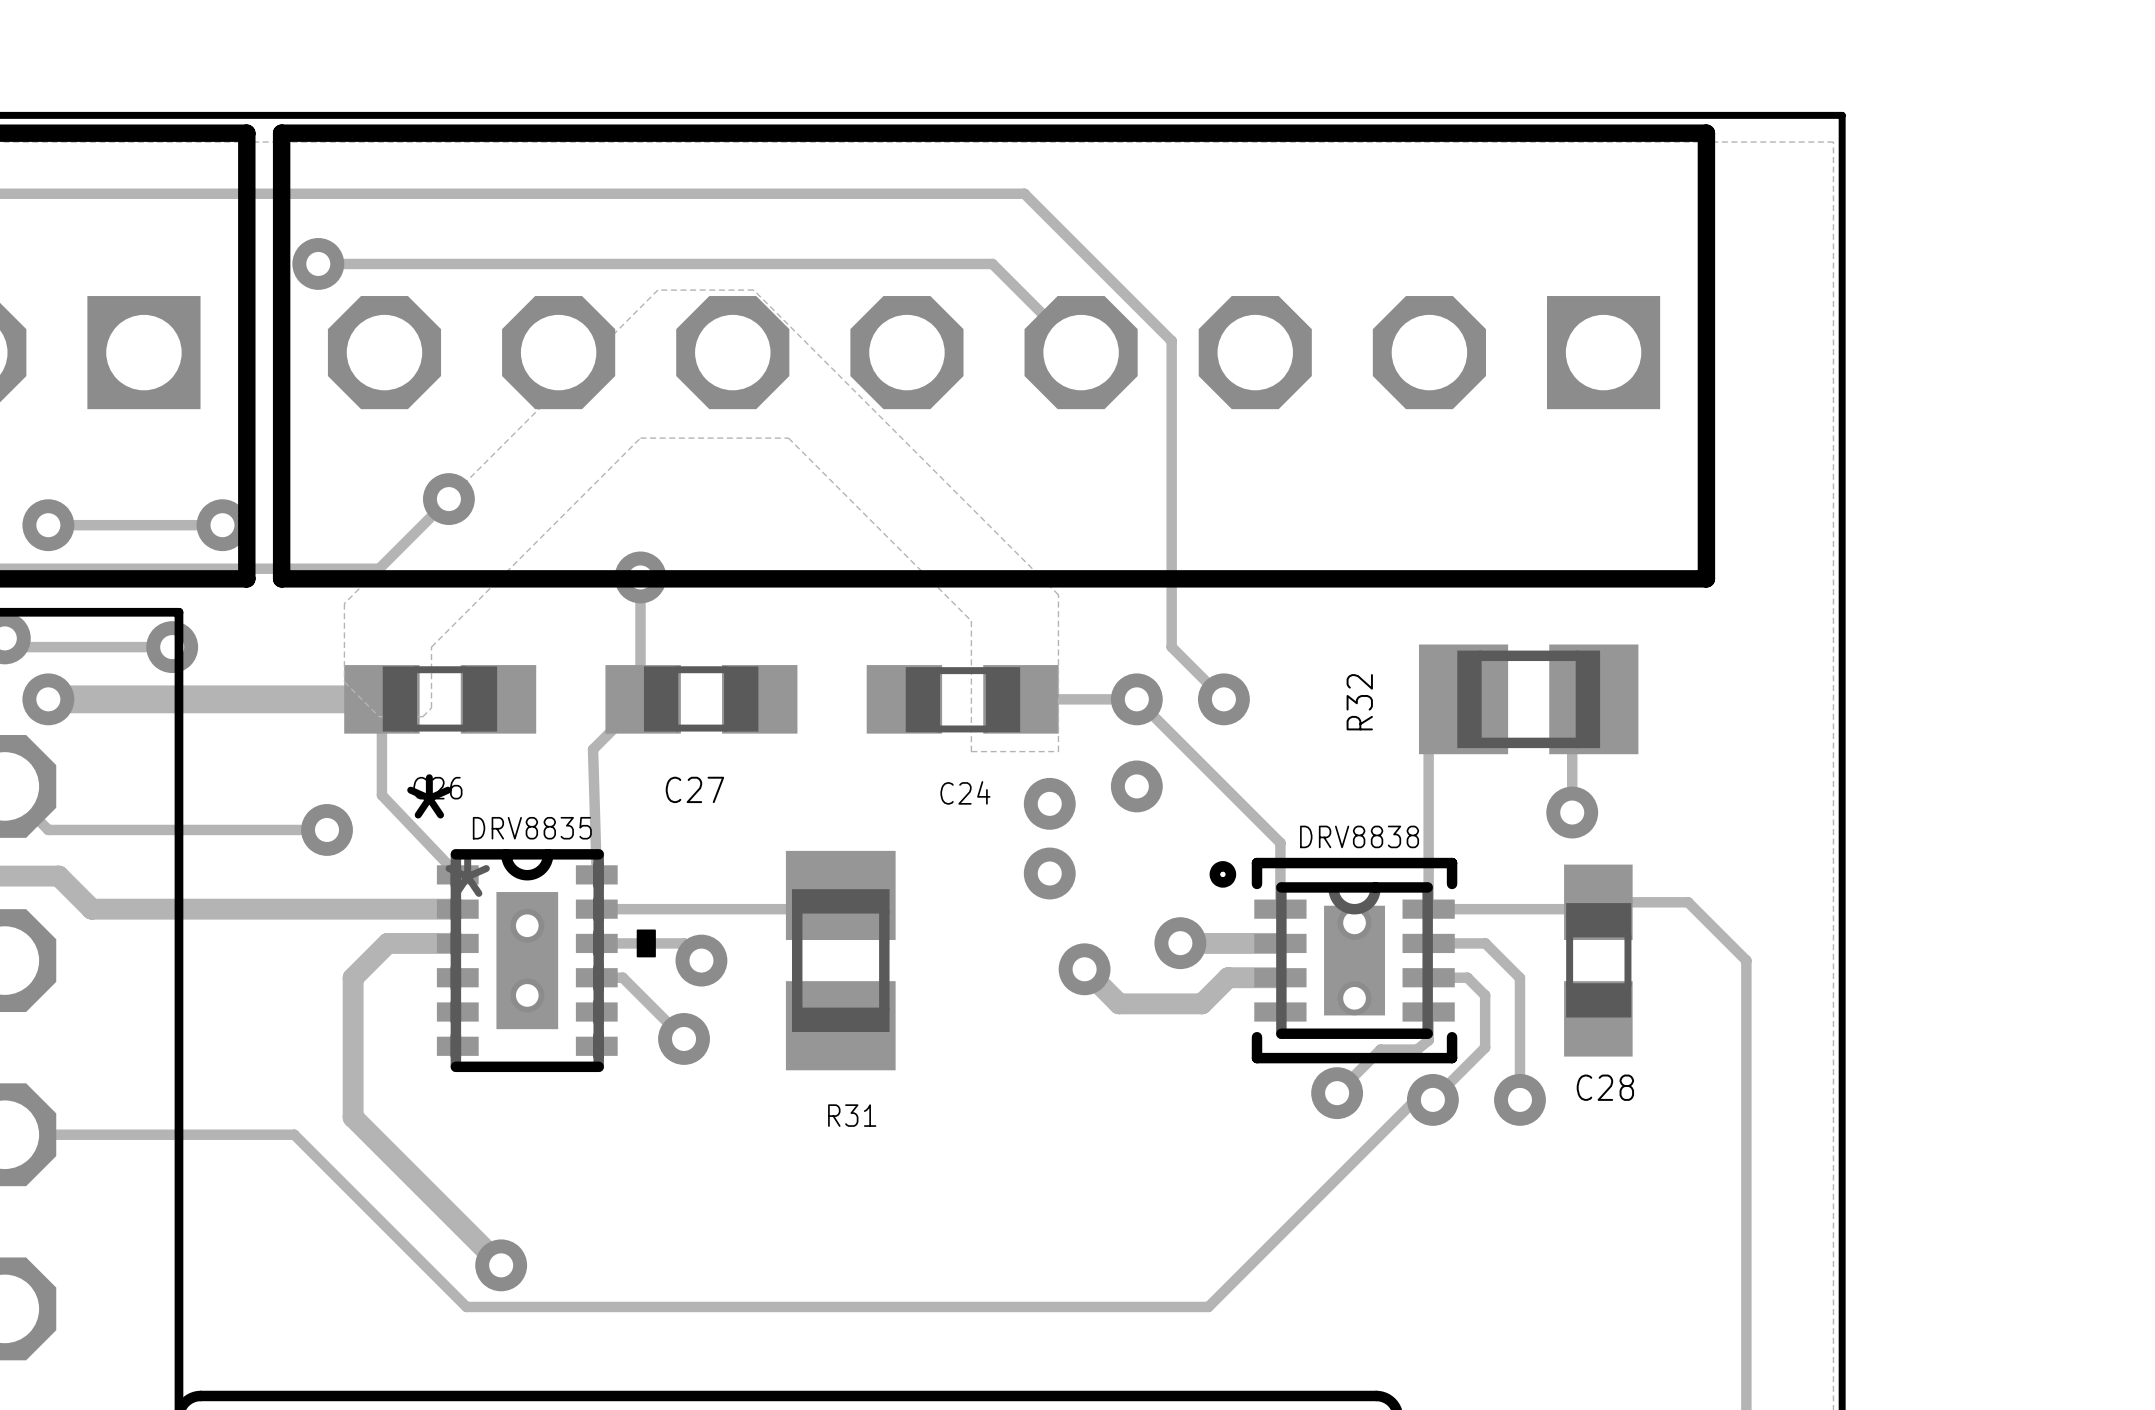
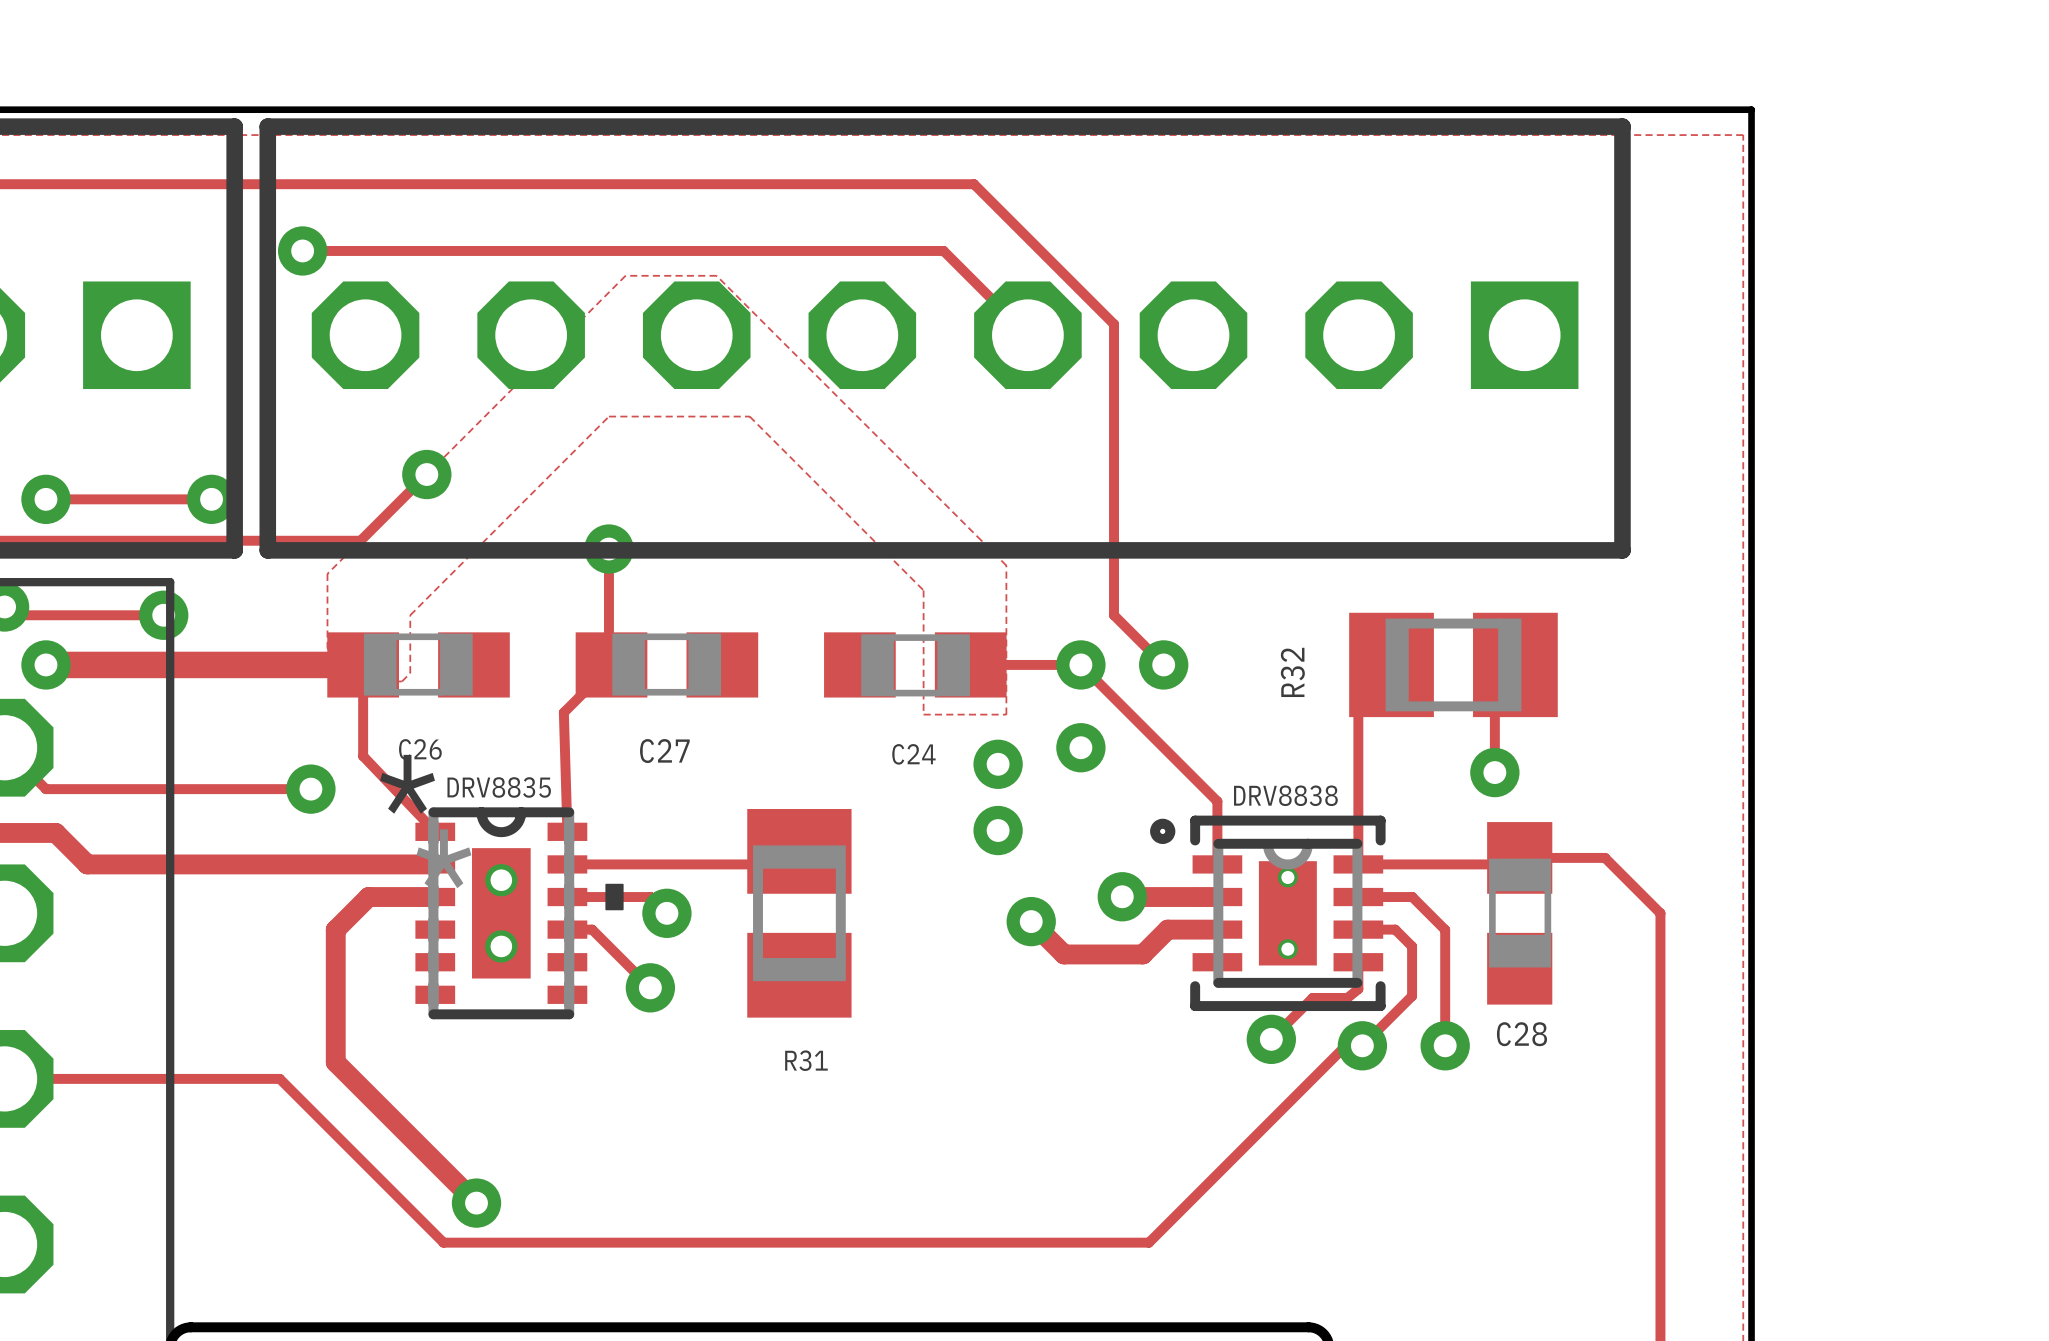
DRV8838 footprint: [1209, 857, 1458, 1064] -> [1150, 815, 1386, 1012]

